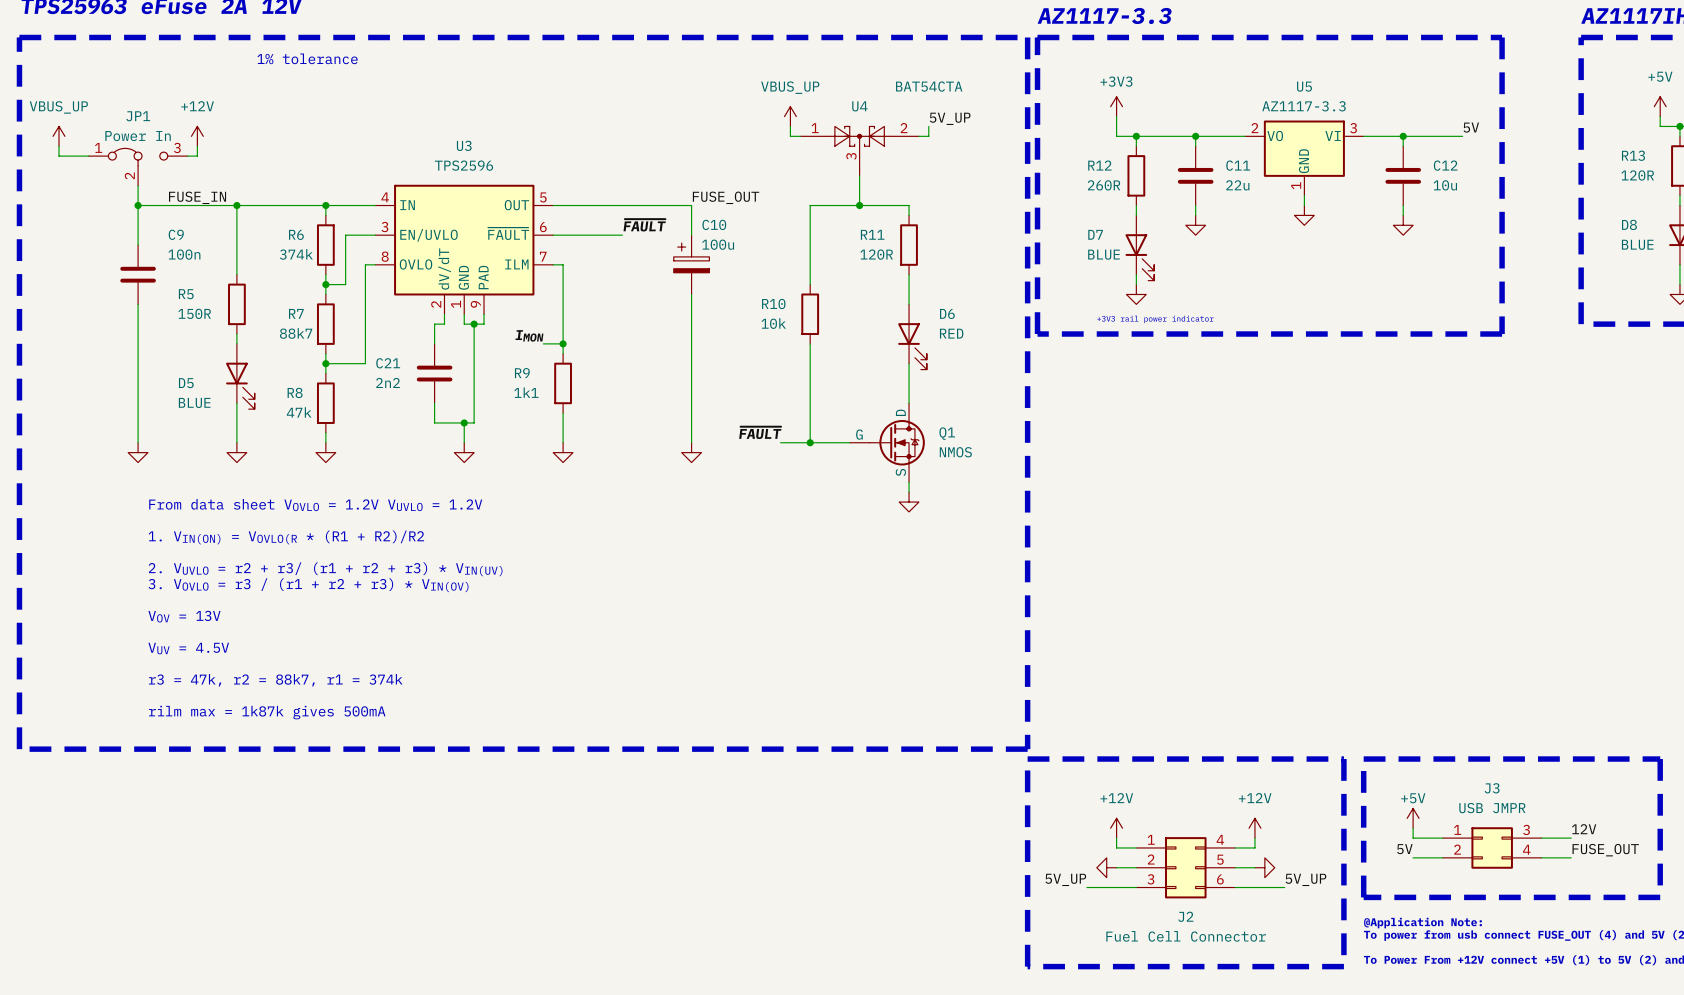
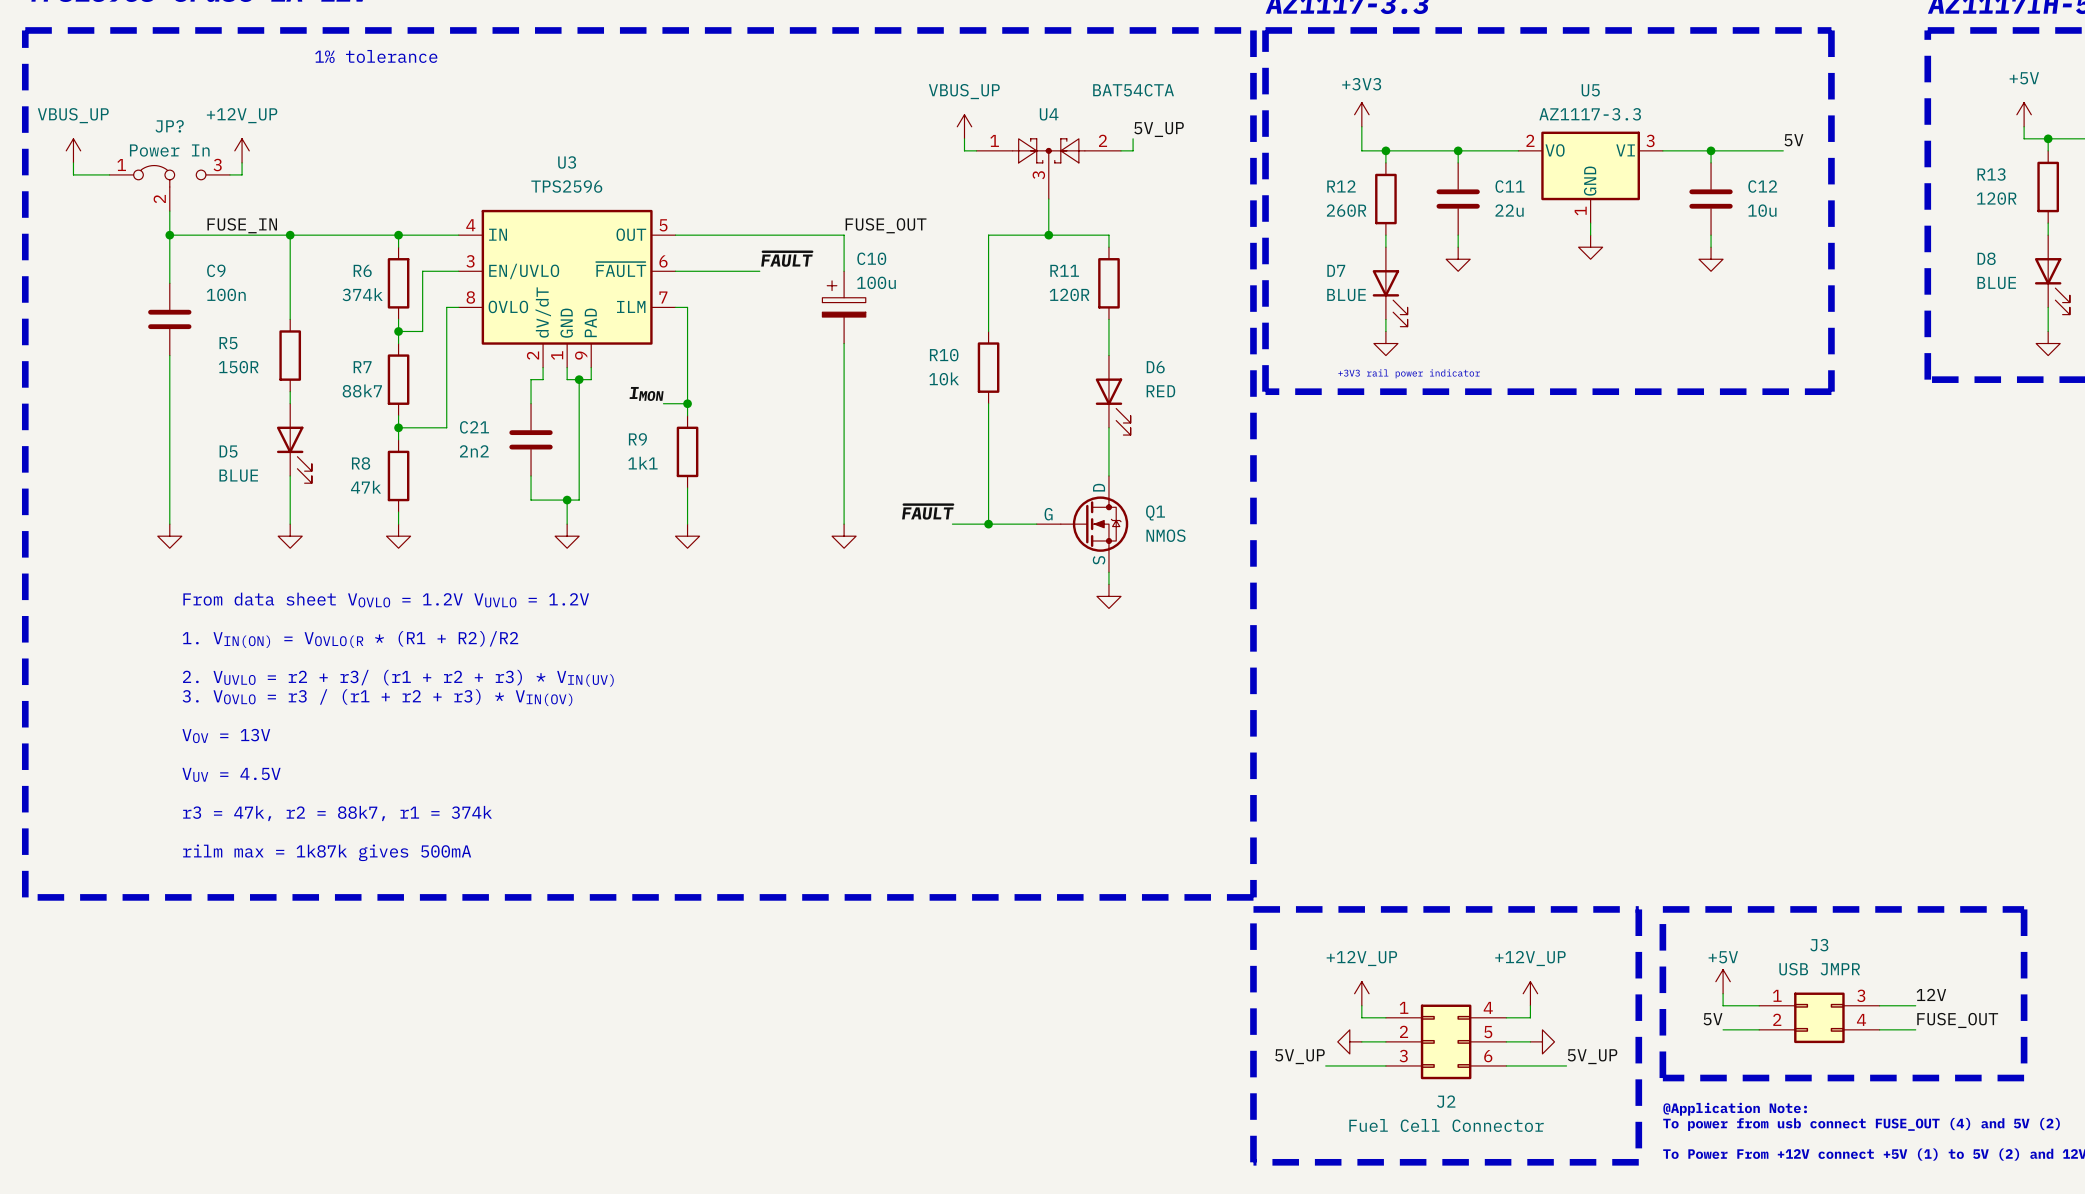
JP1 name: JP1 (138, 116) -> JP? (169, 126)
power symbol: +12V (197, 136) -> +12V_UP (242, 150)
power symbol: +12V (1116, 828) -> +12V_UP (1361, 993)
power symbol: +12V (1254, 828) -> +12V_UP (1530, 993)

